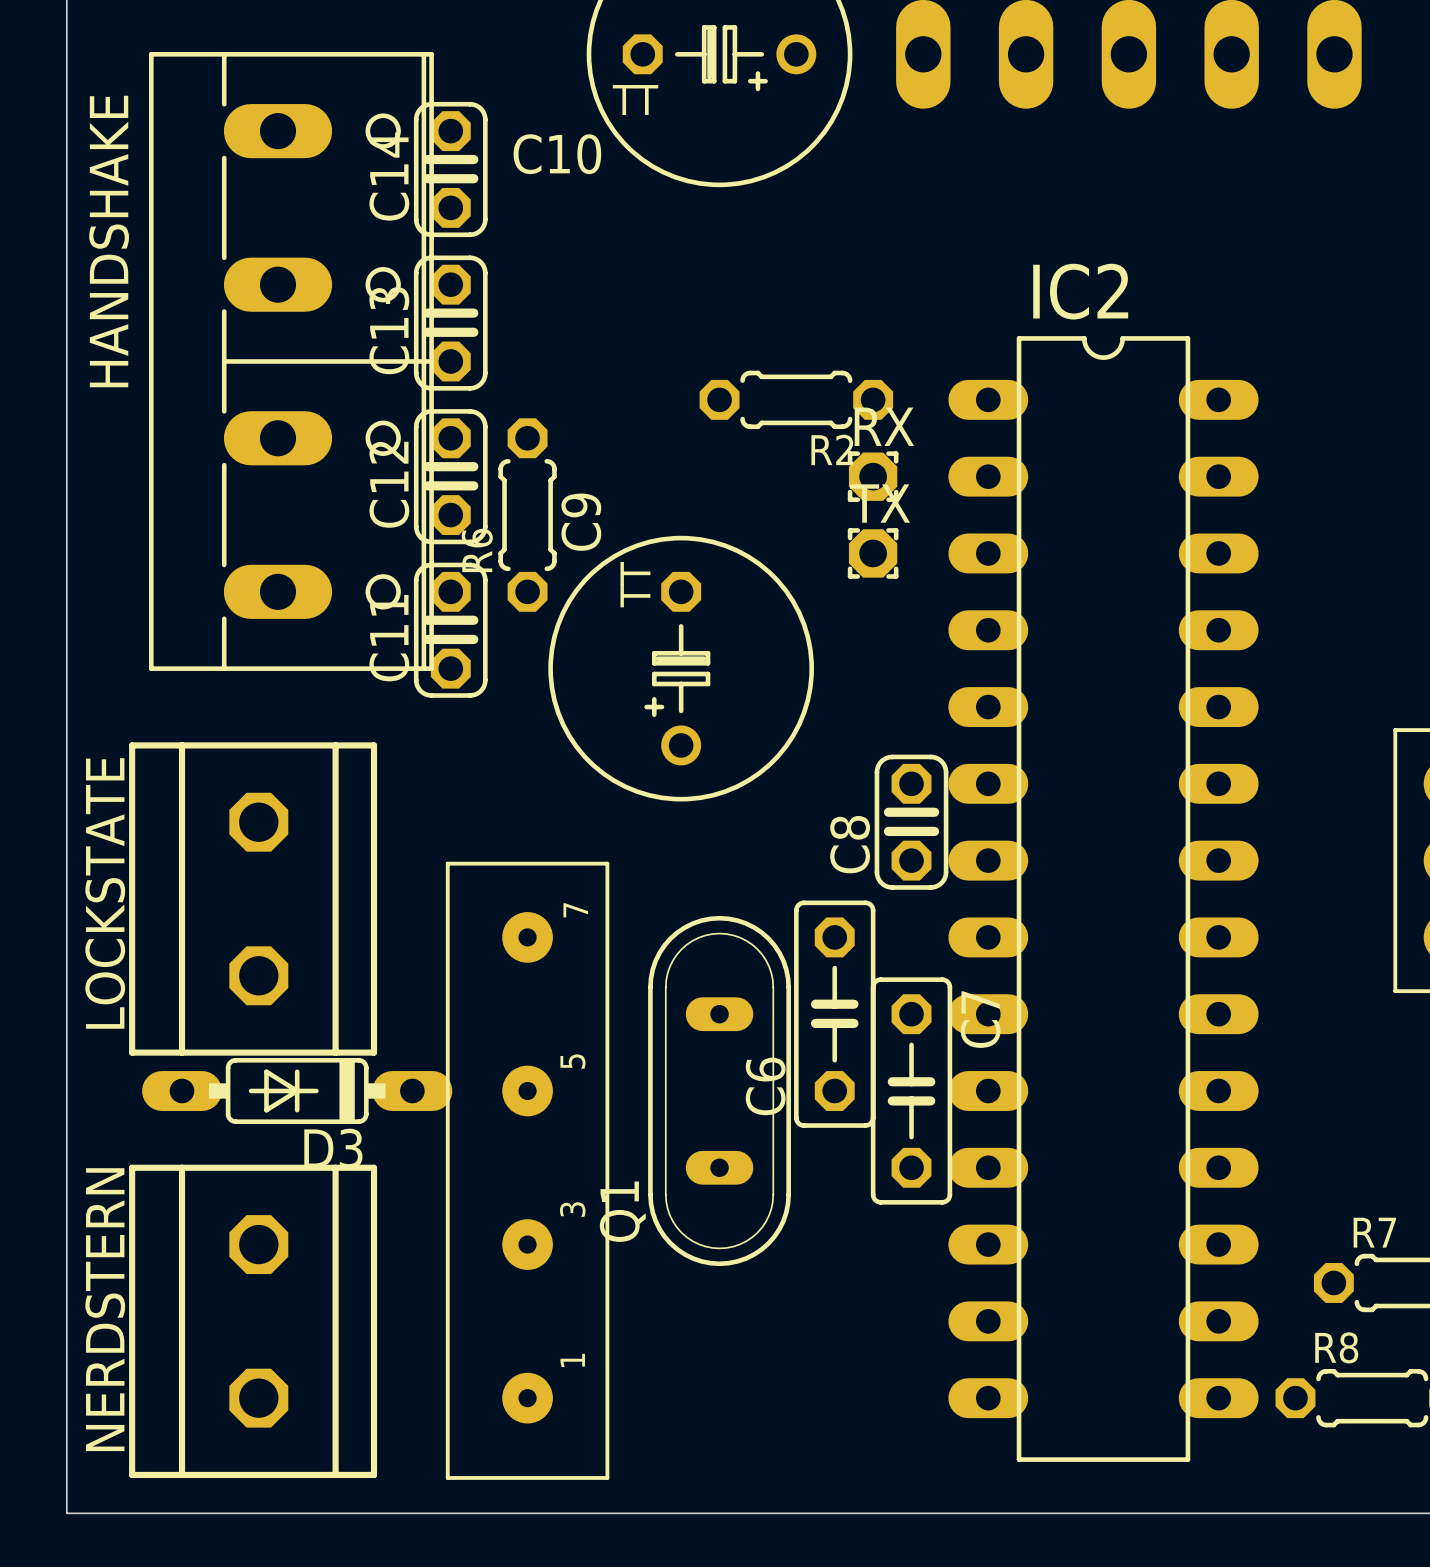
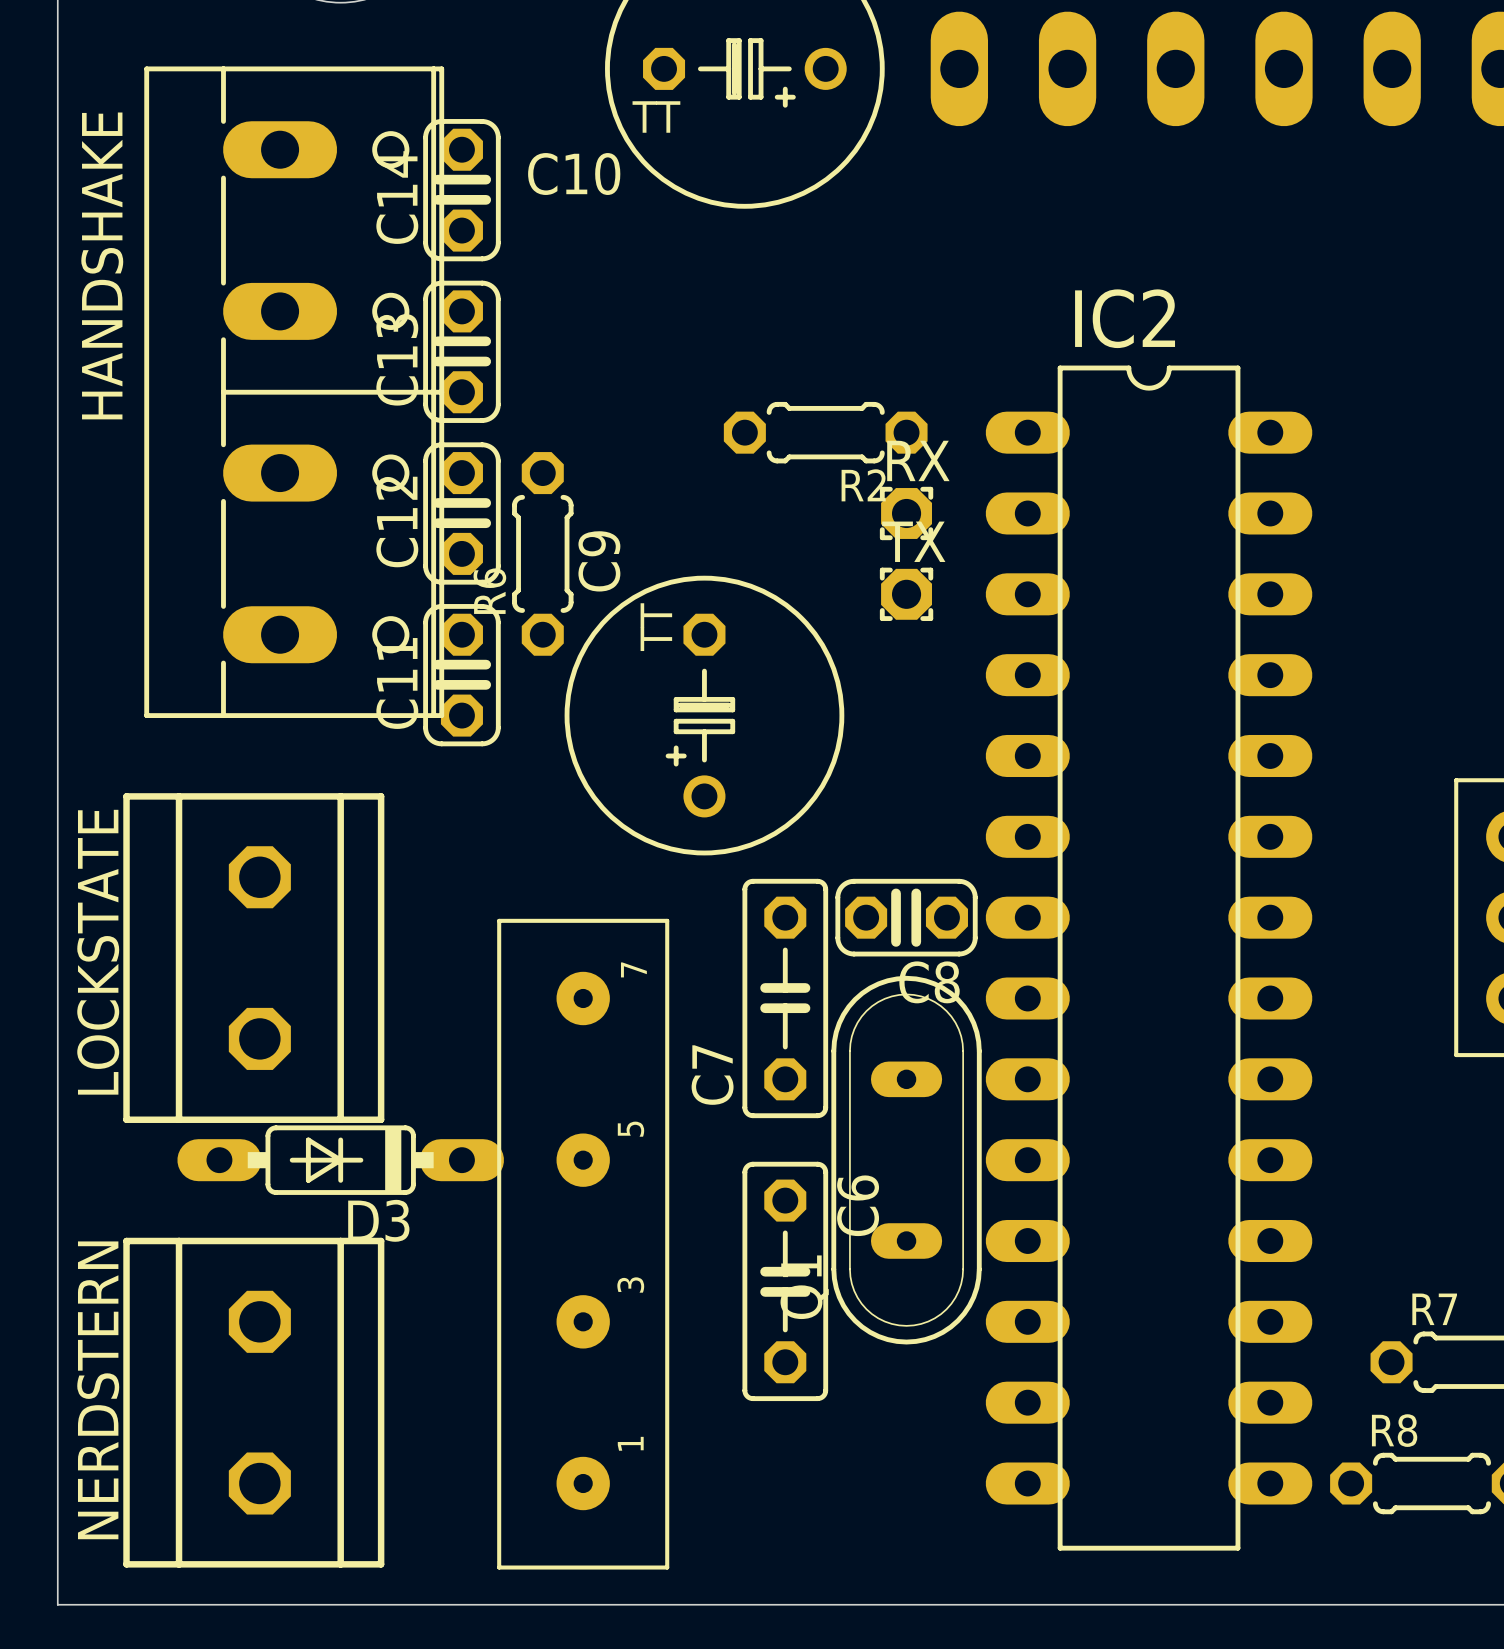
C8 rotation: 0° (911, 822) -> 90° counterclockwise (906, 917)
C6 rotation: 0° (834, 1014) -> 180° (785, 1281)
C6 position: (834, 1014) -> (785, 1281)
D3 position: (297, 1090) -> (340, 1160)
Q1 position: (719, 1090) -> (906, 1160)
C7 rotation: 0° (911, 1090) -> 180° (785, 998)
C7 position: (911, 1090) -> (785, 998)
part position: (527, 1170) -> (583, 1244)

